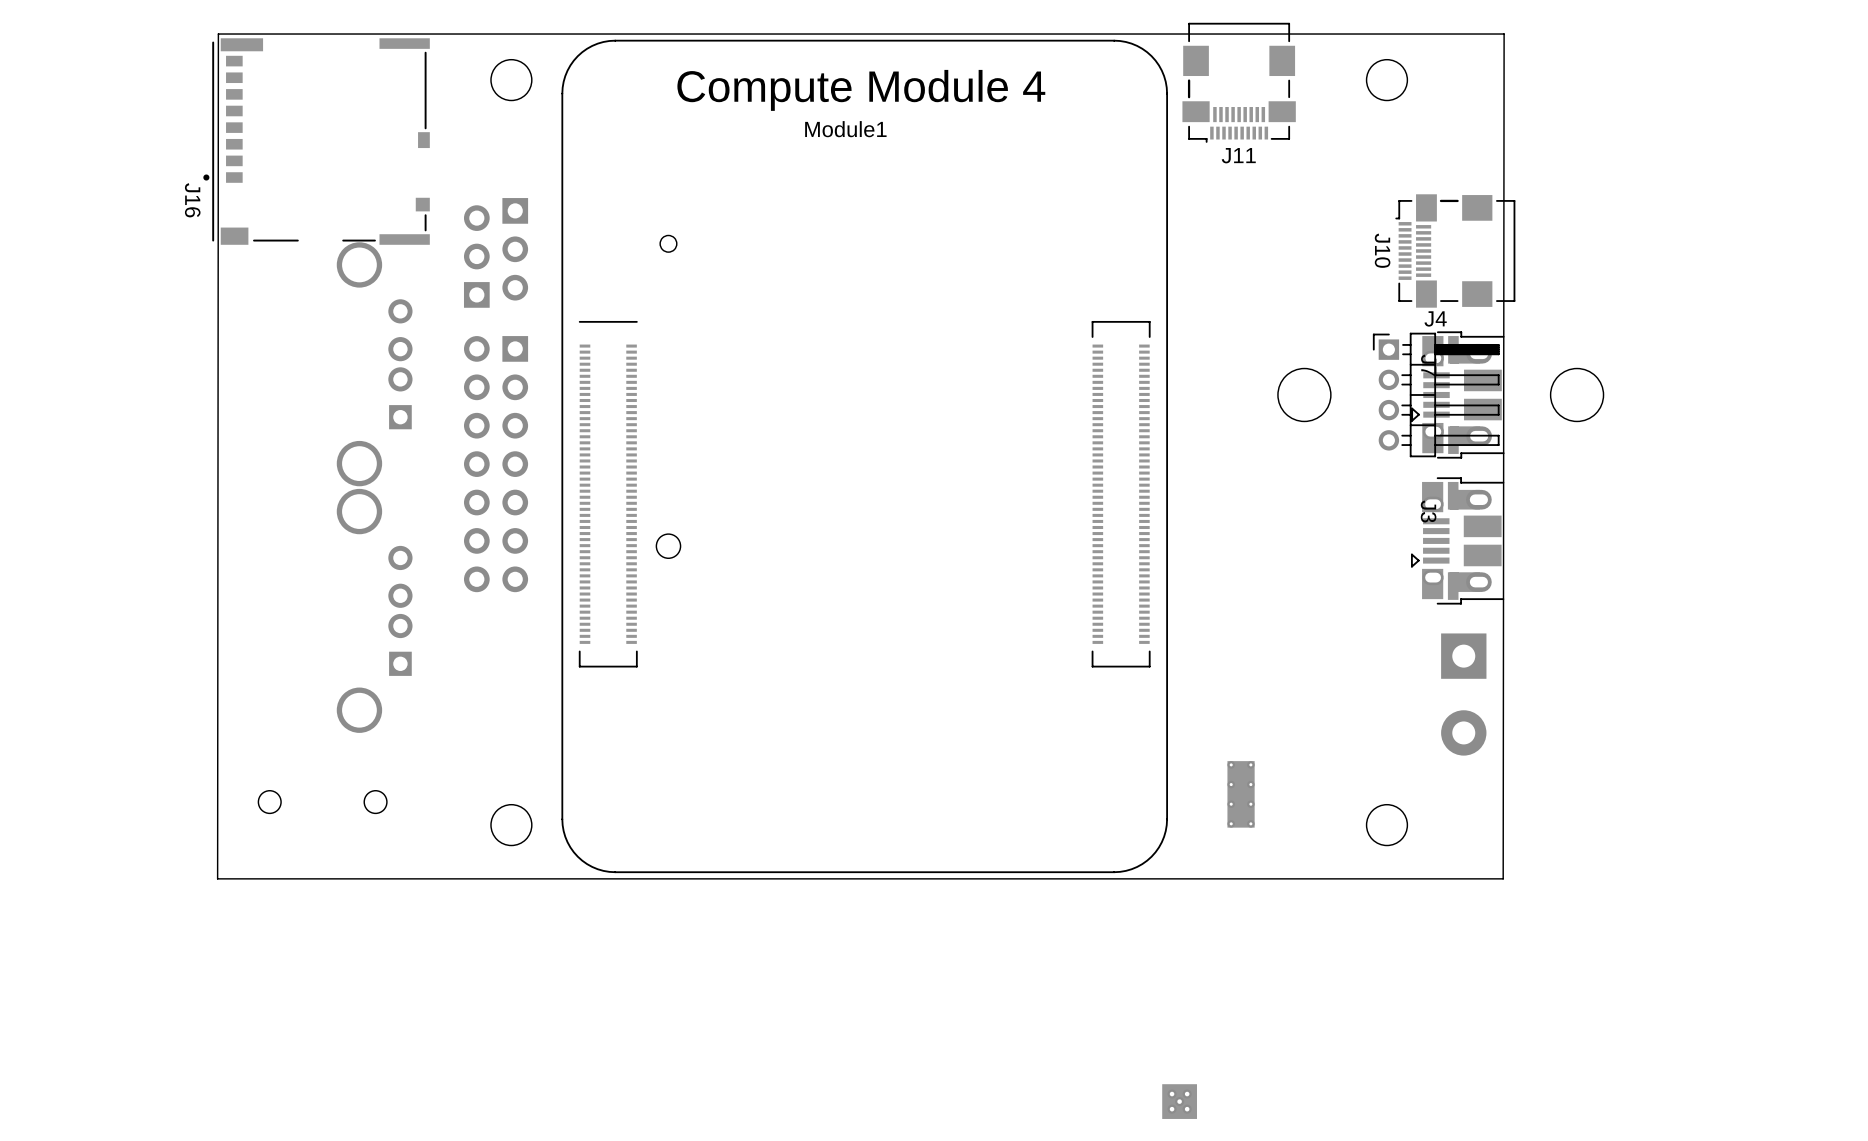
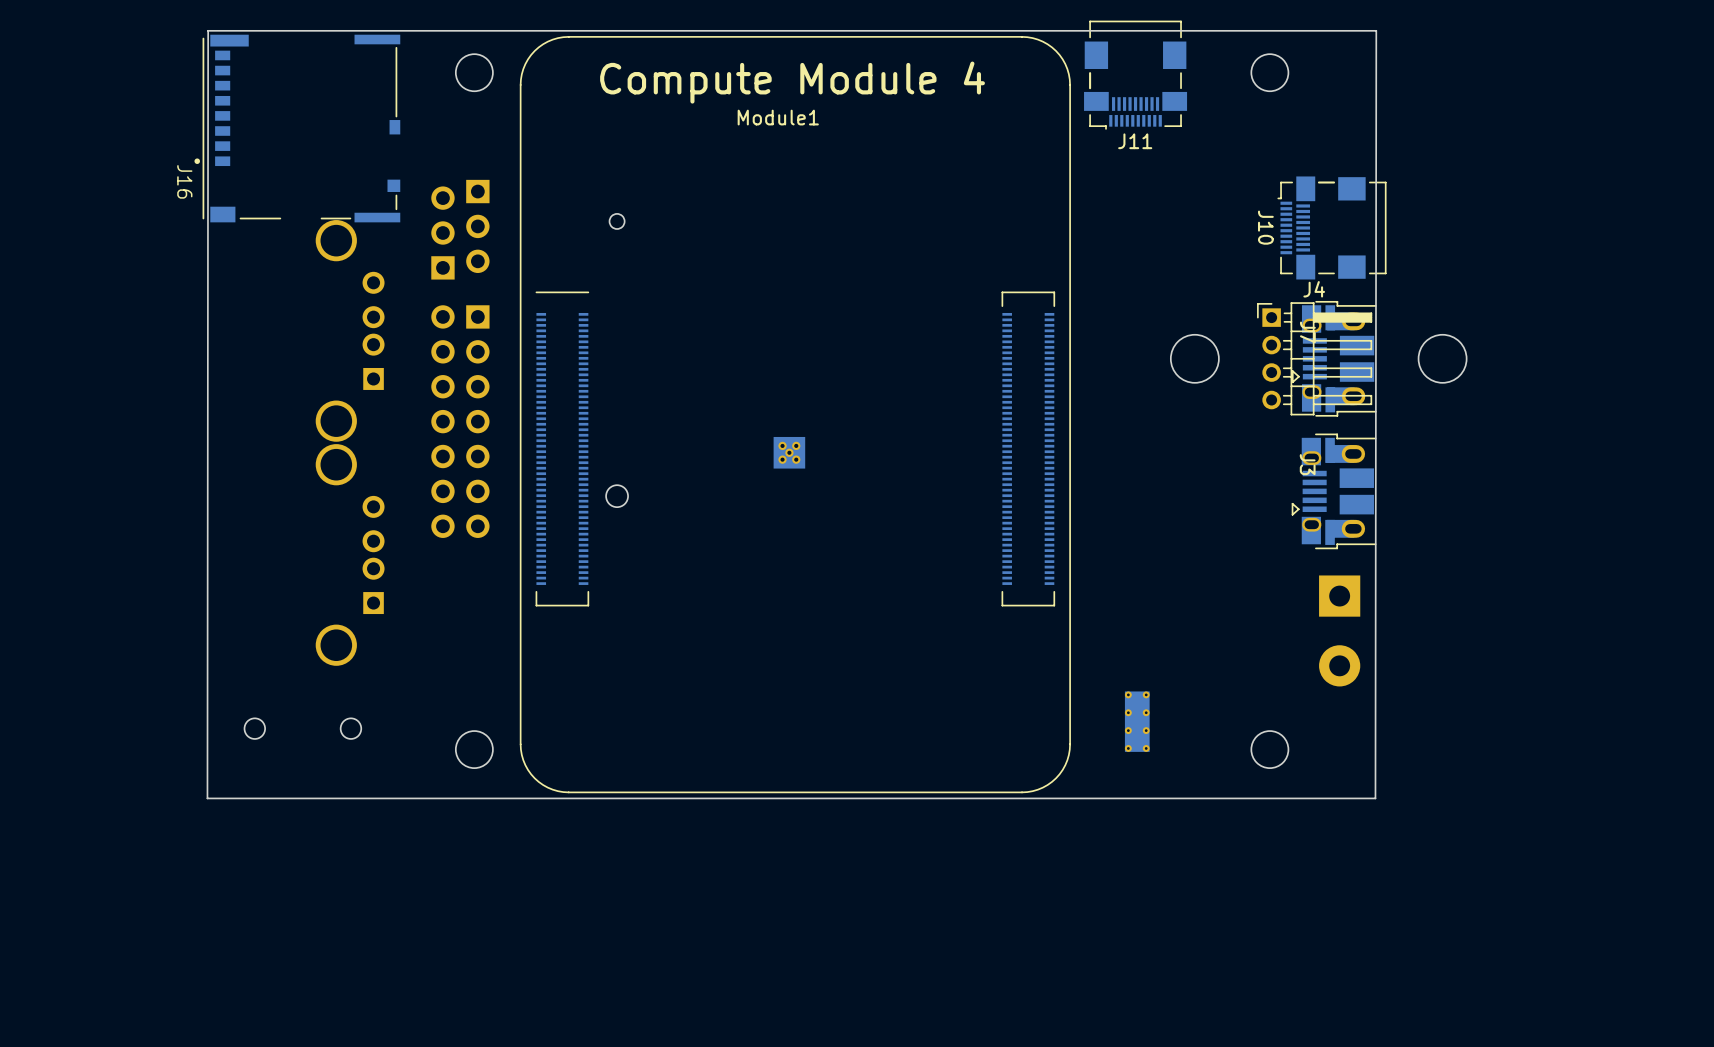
part: none -> (789, 452)
part: (1179, 1101) -> none

